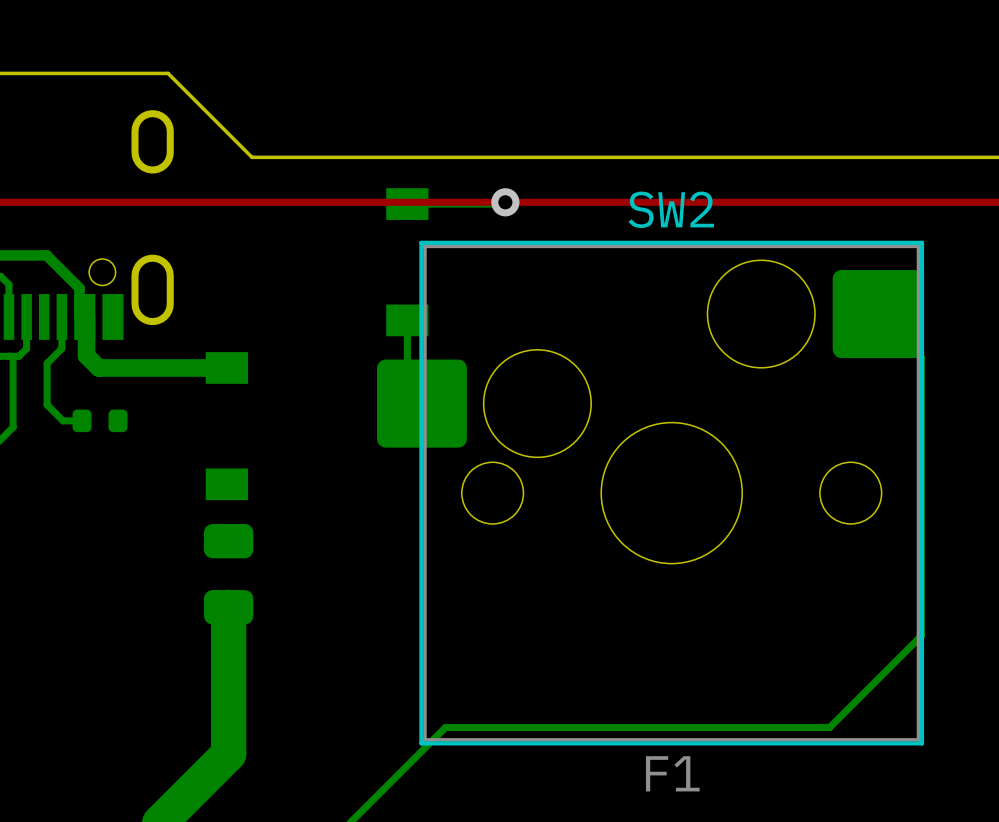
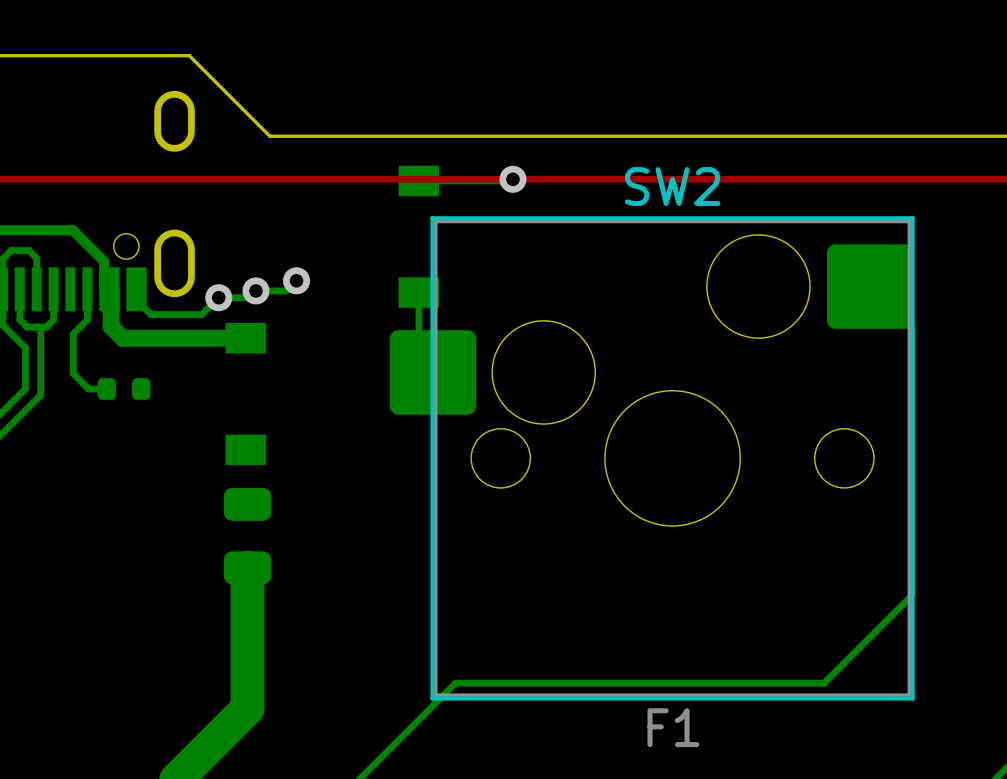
bottom track: none -> (296, 280) (286, 290) (255, 290) (249, 297) (218, 297) (201, 314) (151, 314) (141, 305) (141, 289)
via: none -> (296, 280)
via: none -> (255, 290)
via: none -> (218, 297)

